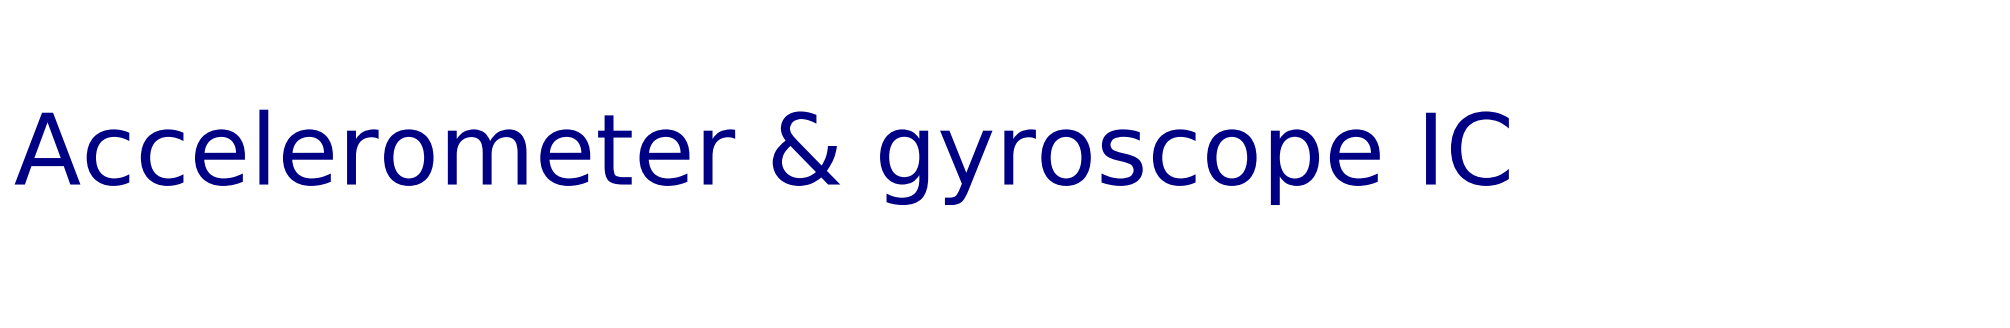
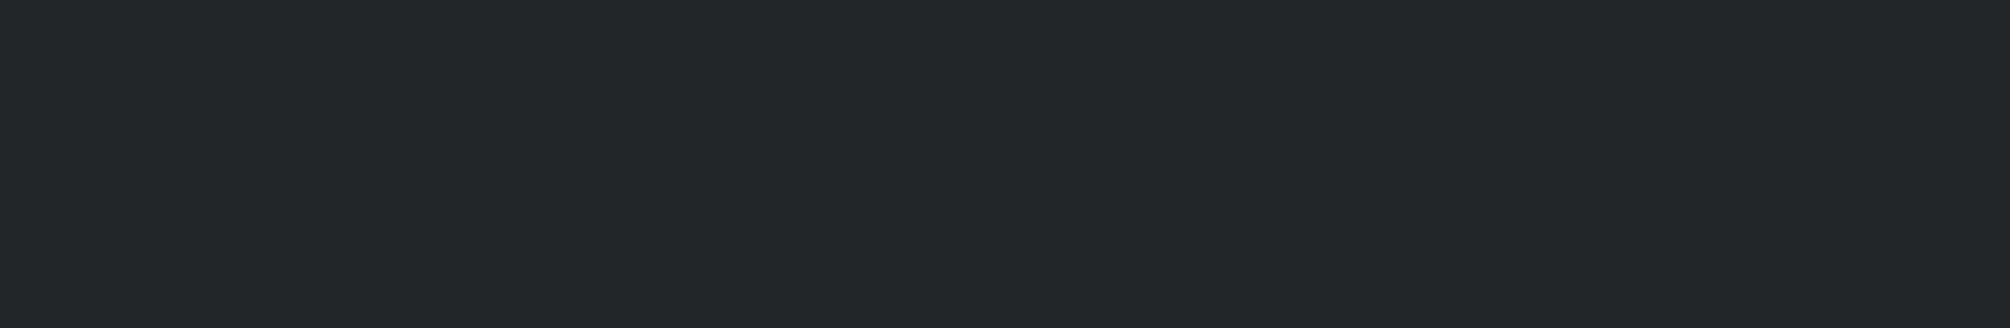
text: Accelerometer & gyroscope IC (761, 157) -> none

